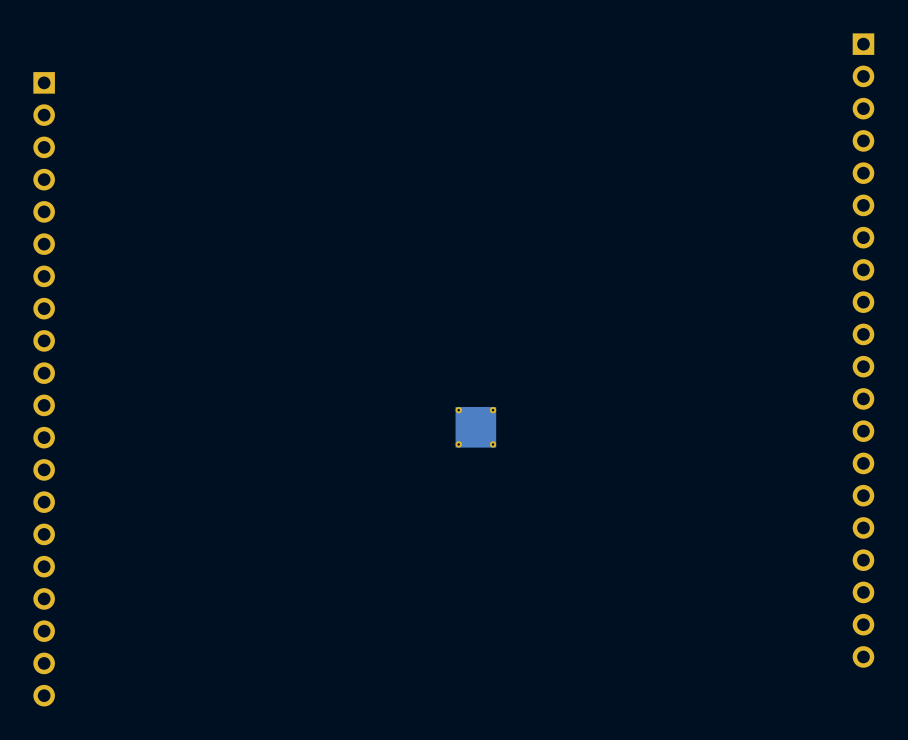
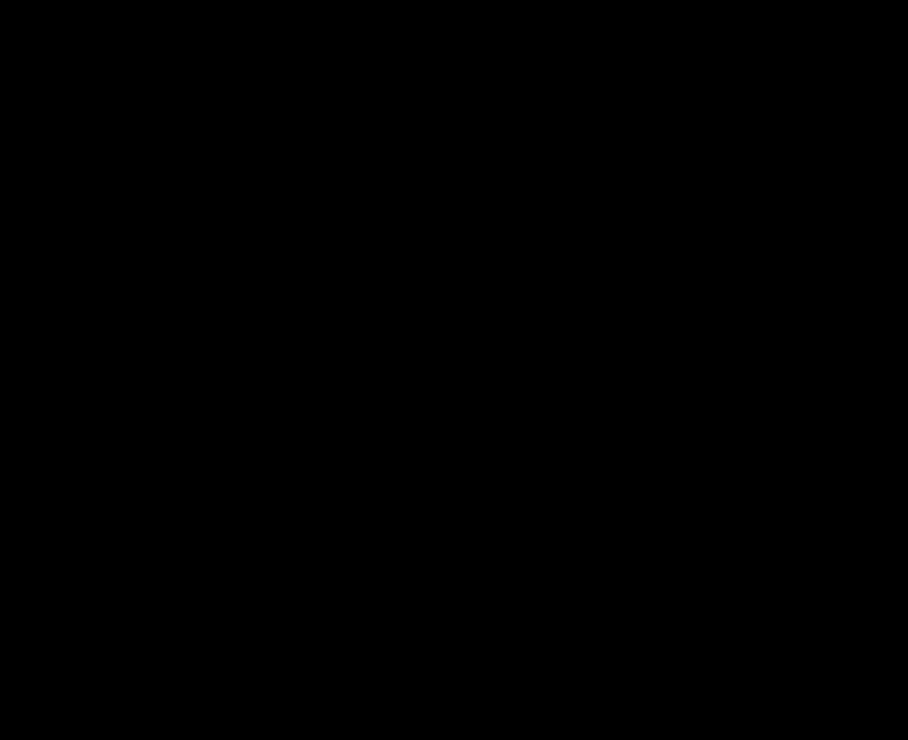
part: (863, 350) -> none
part: (44, 389) -> none
part: (475, 427) -> none

